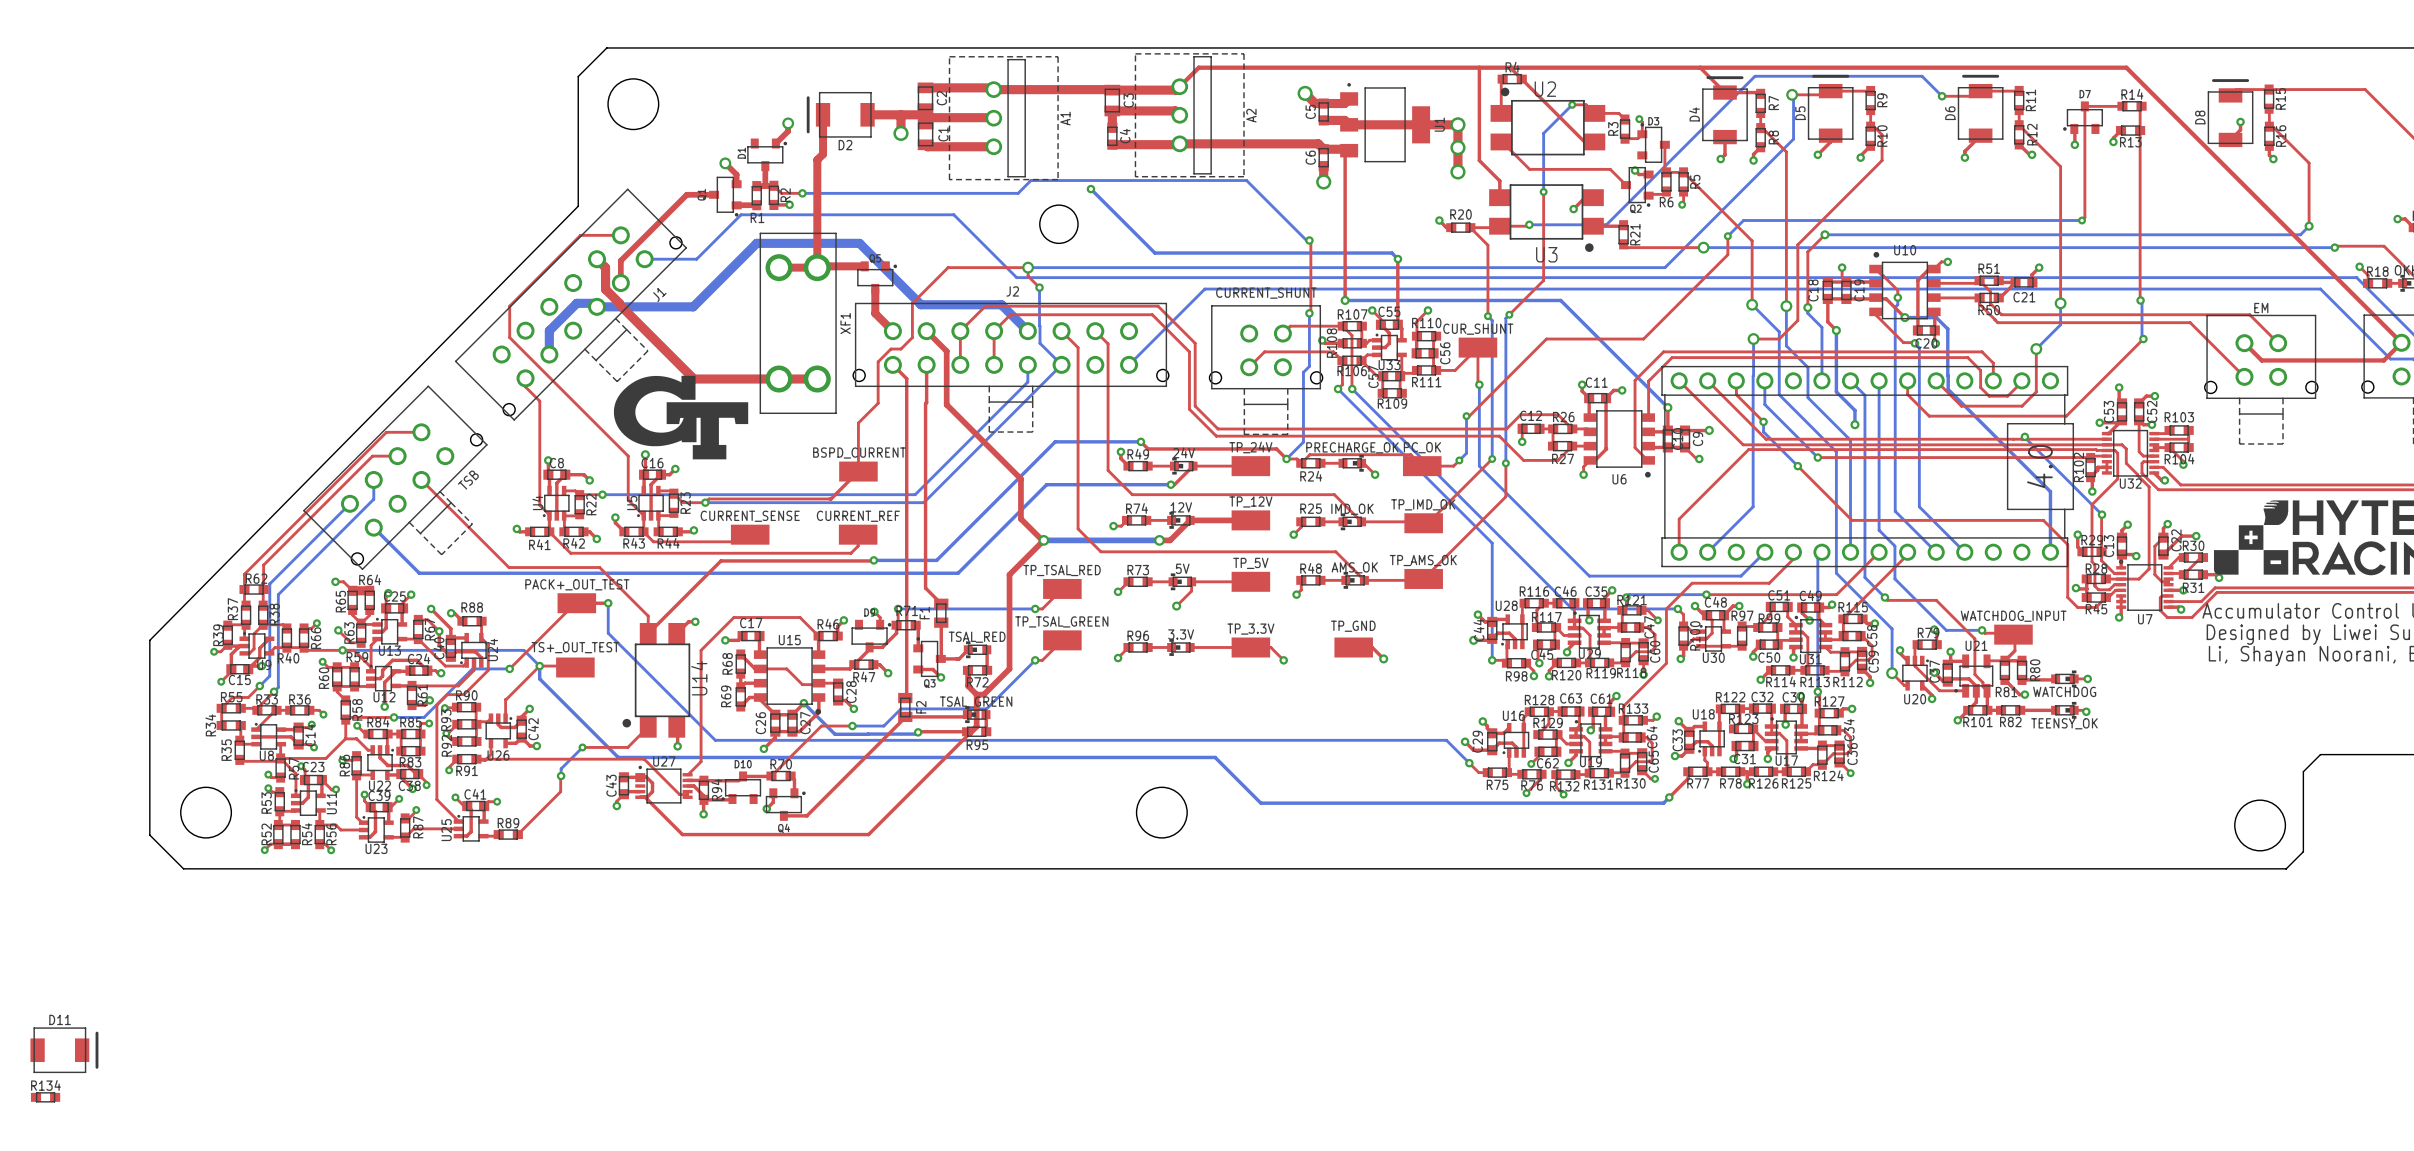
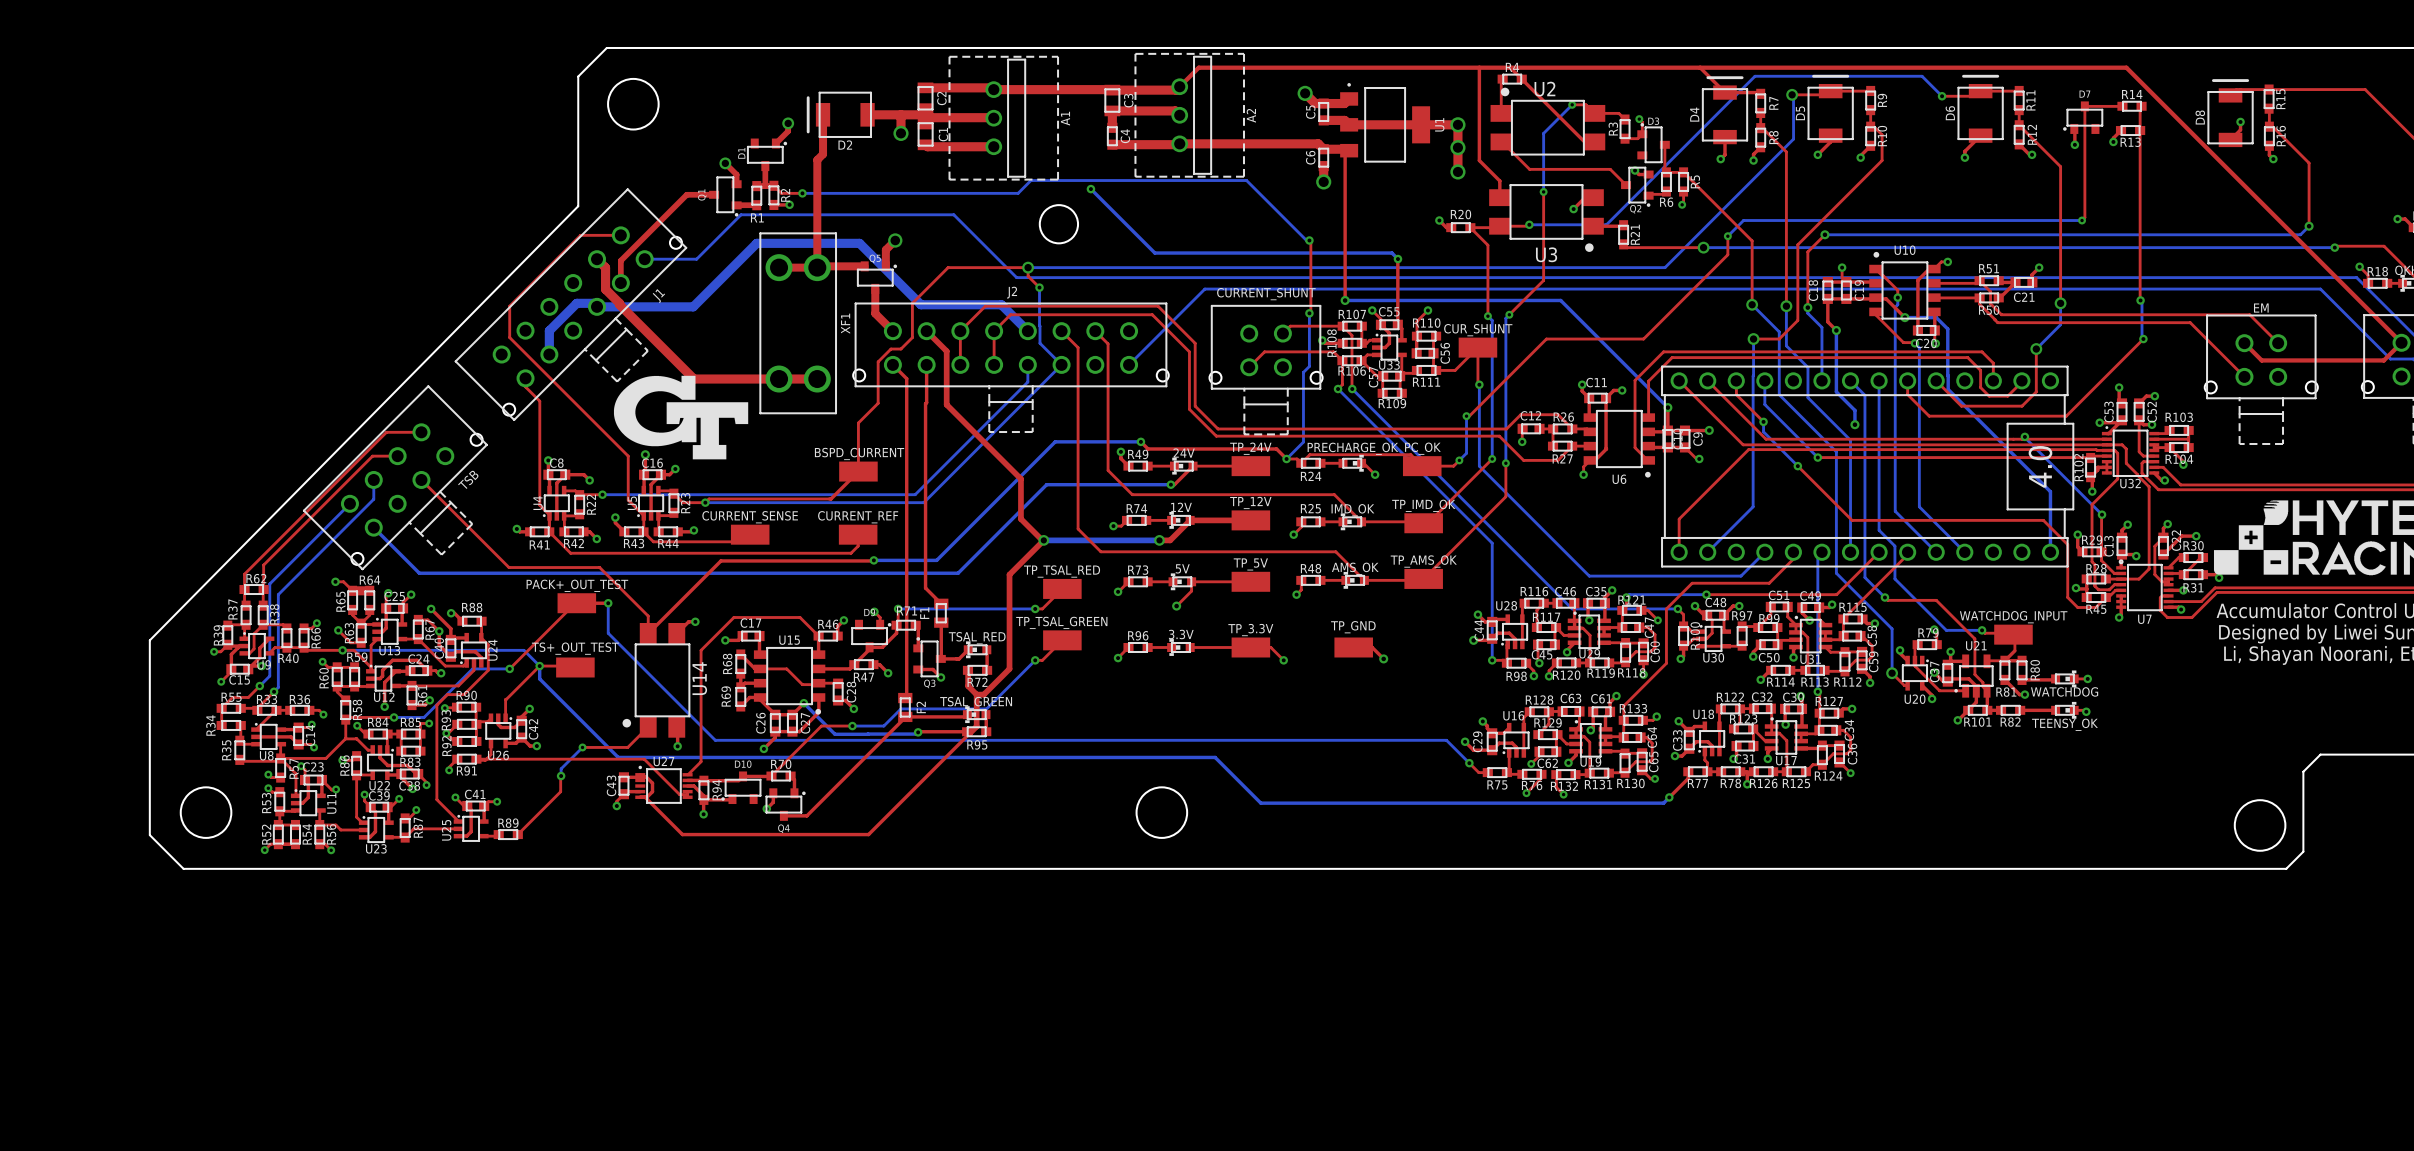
top track: none -> (895, 240) (885, 249) (885, 266)
via: none -> (895, 240)
D11: (64, 1050) -> none
R134: (45, 1097) -> none

